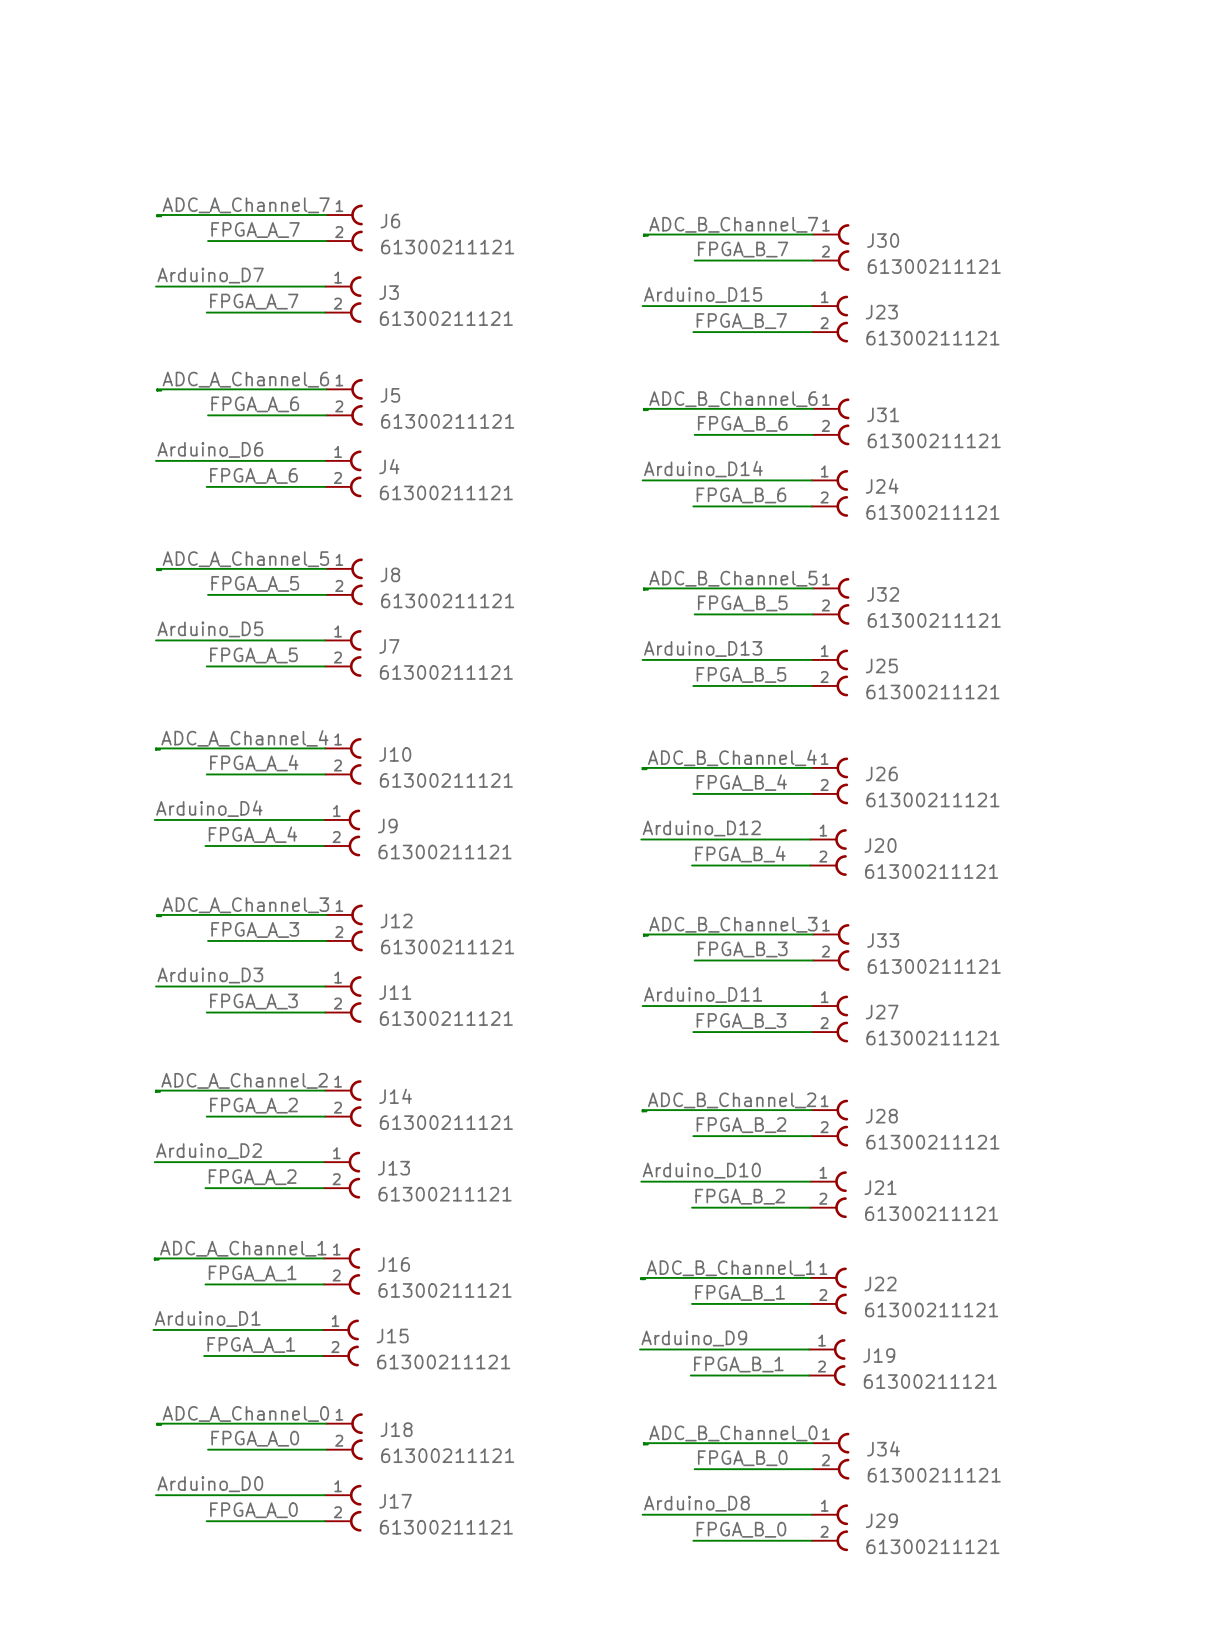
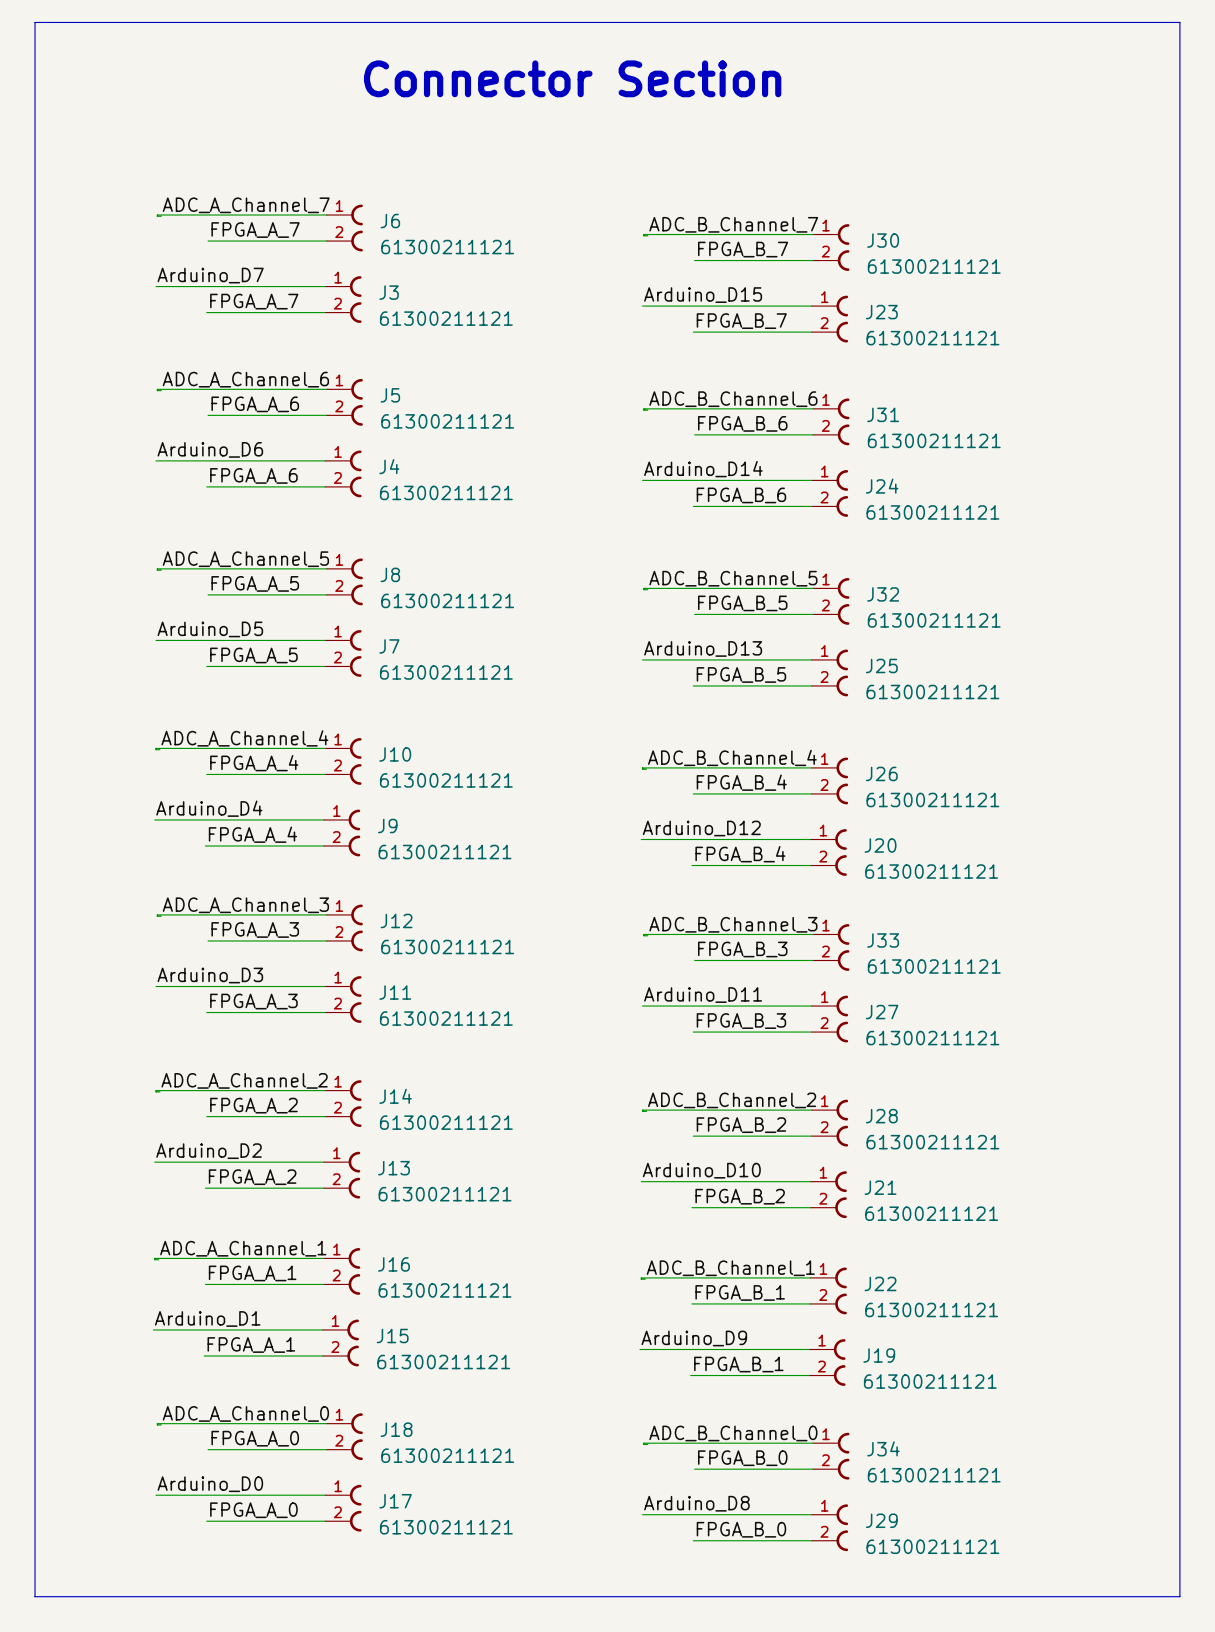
line: none -> (35, 22) (1179, 22) (1179, 1596) (35, 1596) (35, 22)
text: none -> Connector Section (572, 78)

